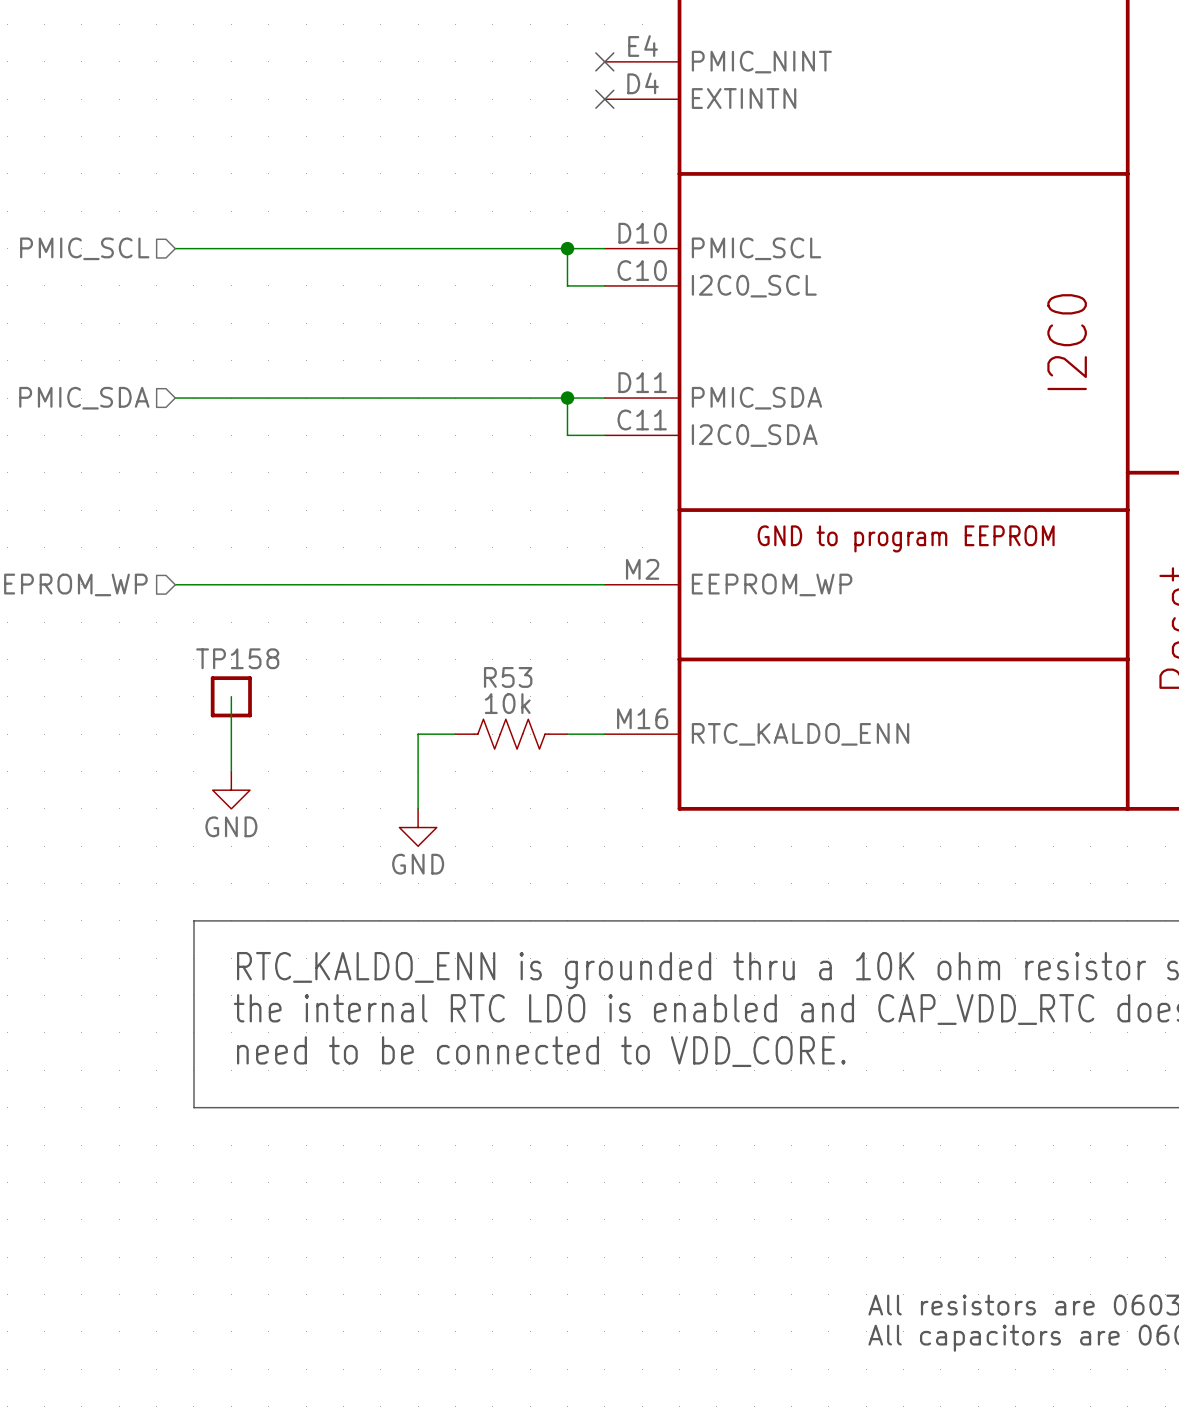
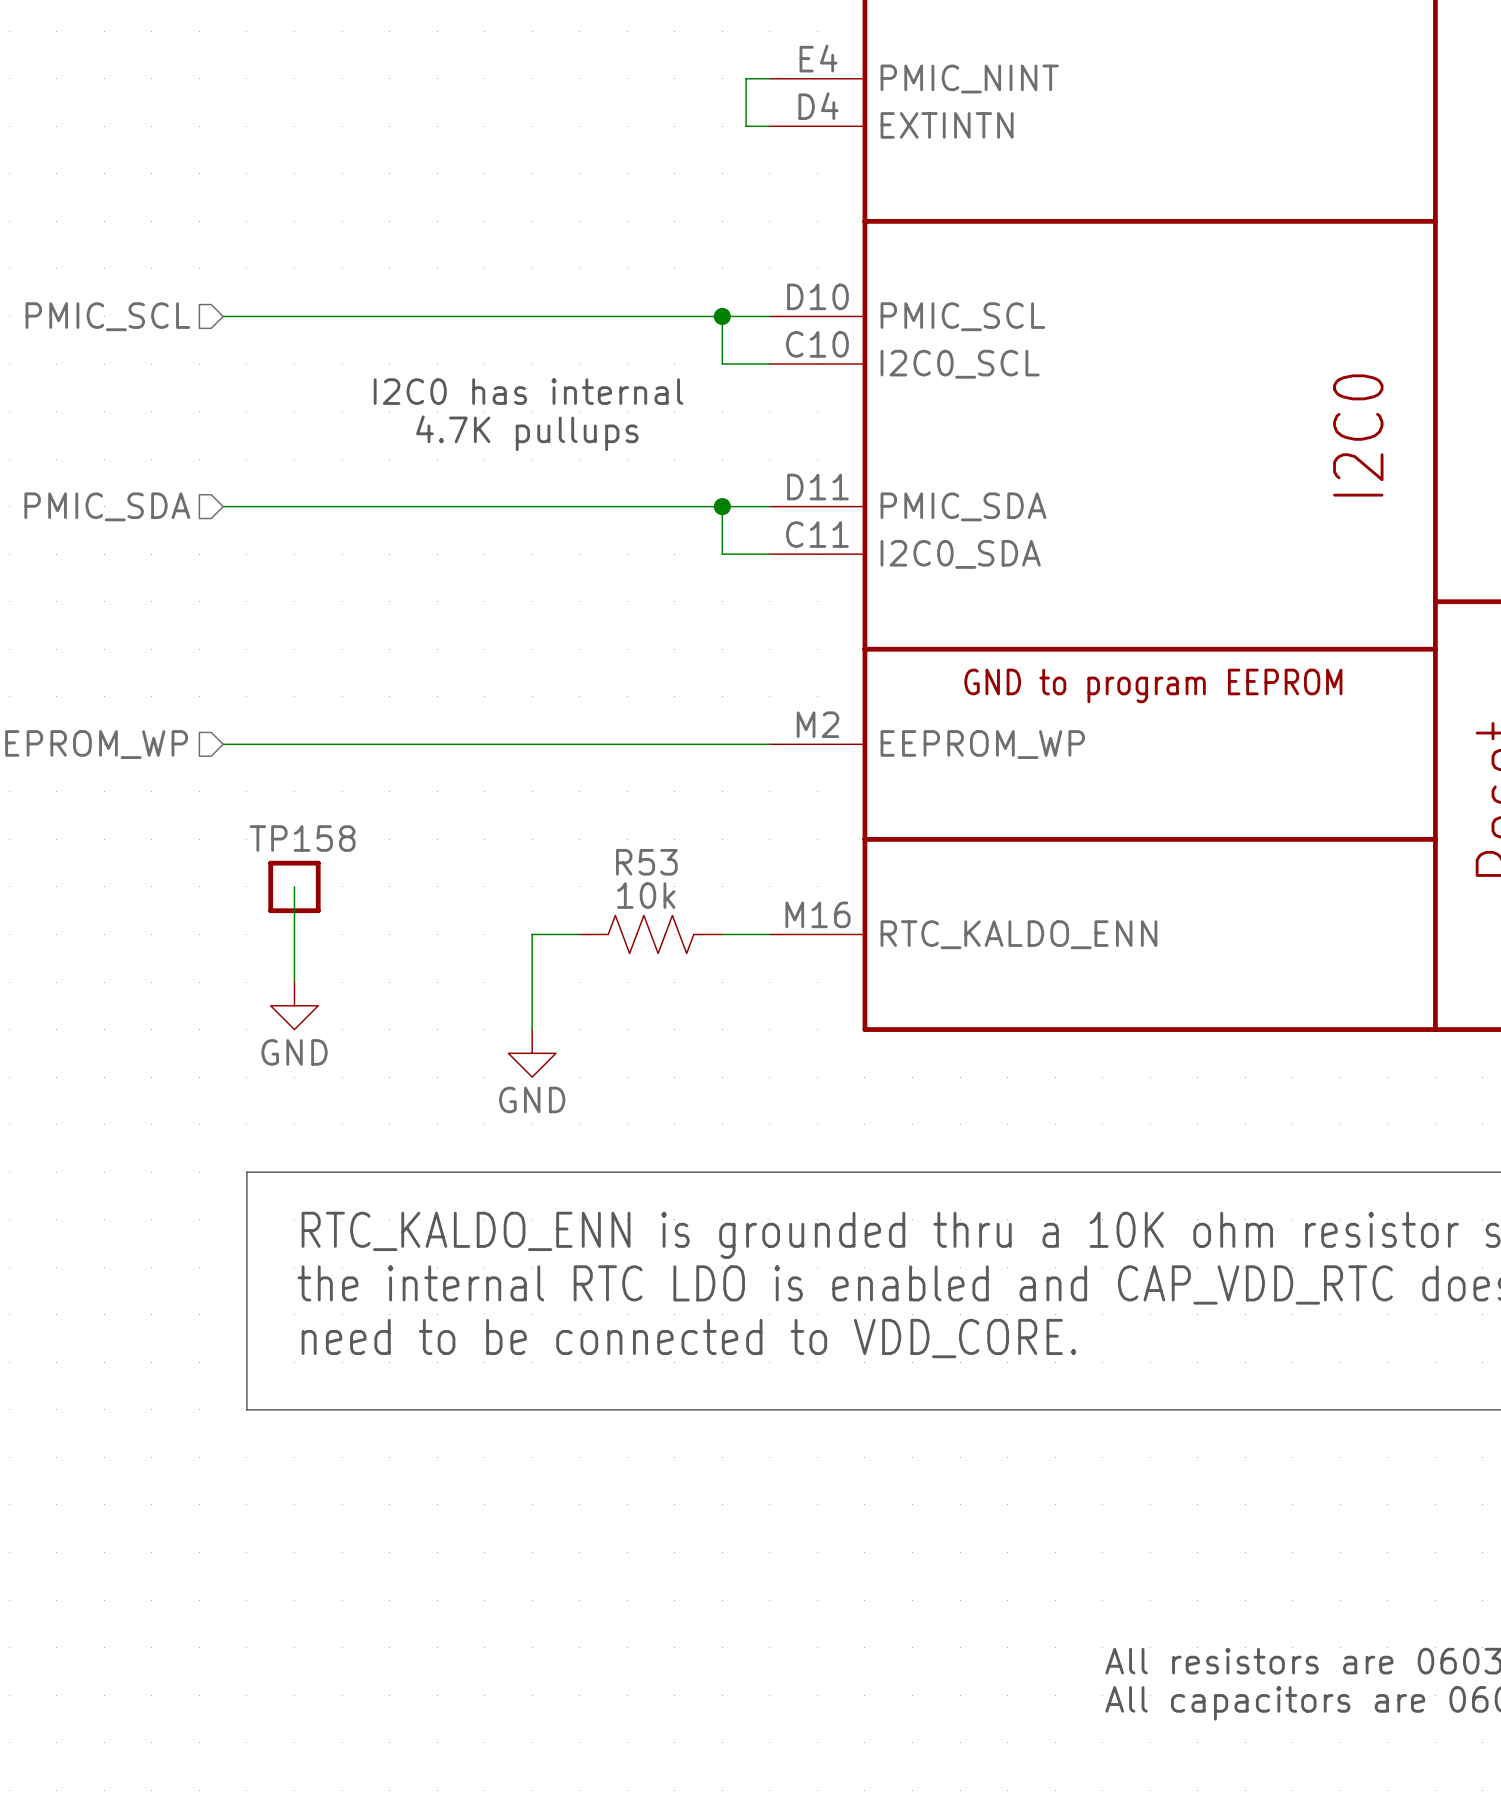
wire: none -> (769, 78) (746, 78) (746, 126) (769, 126)
no-connect mark: (604, 61) -> none
no-connect mark: (604, 99) -> none
text: none -> I2C0 has internal (528, 391)
text: none -> 4.7K pullups (527, 433)

